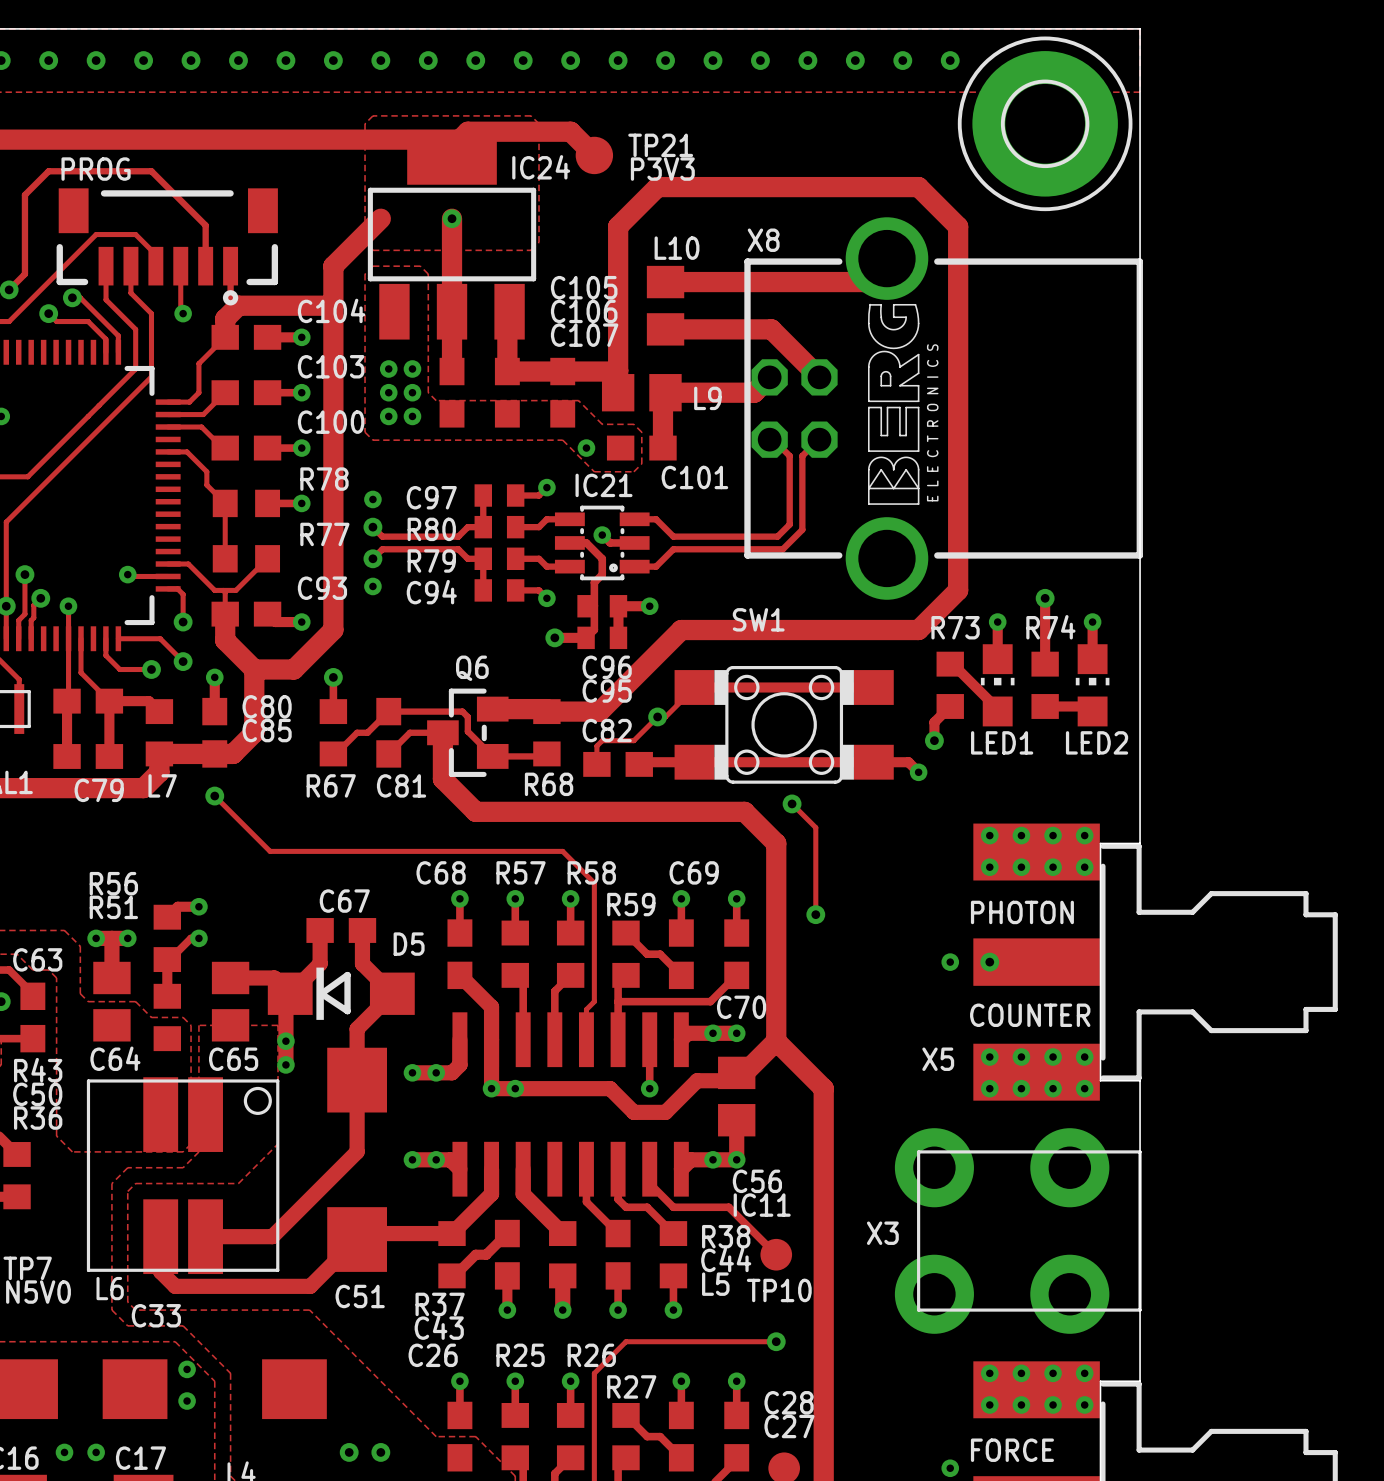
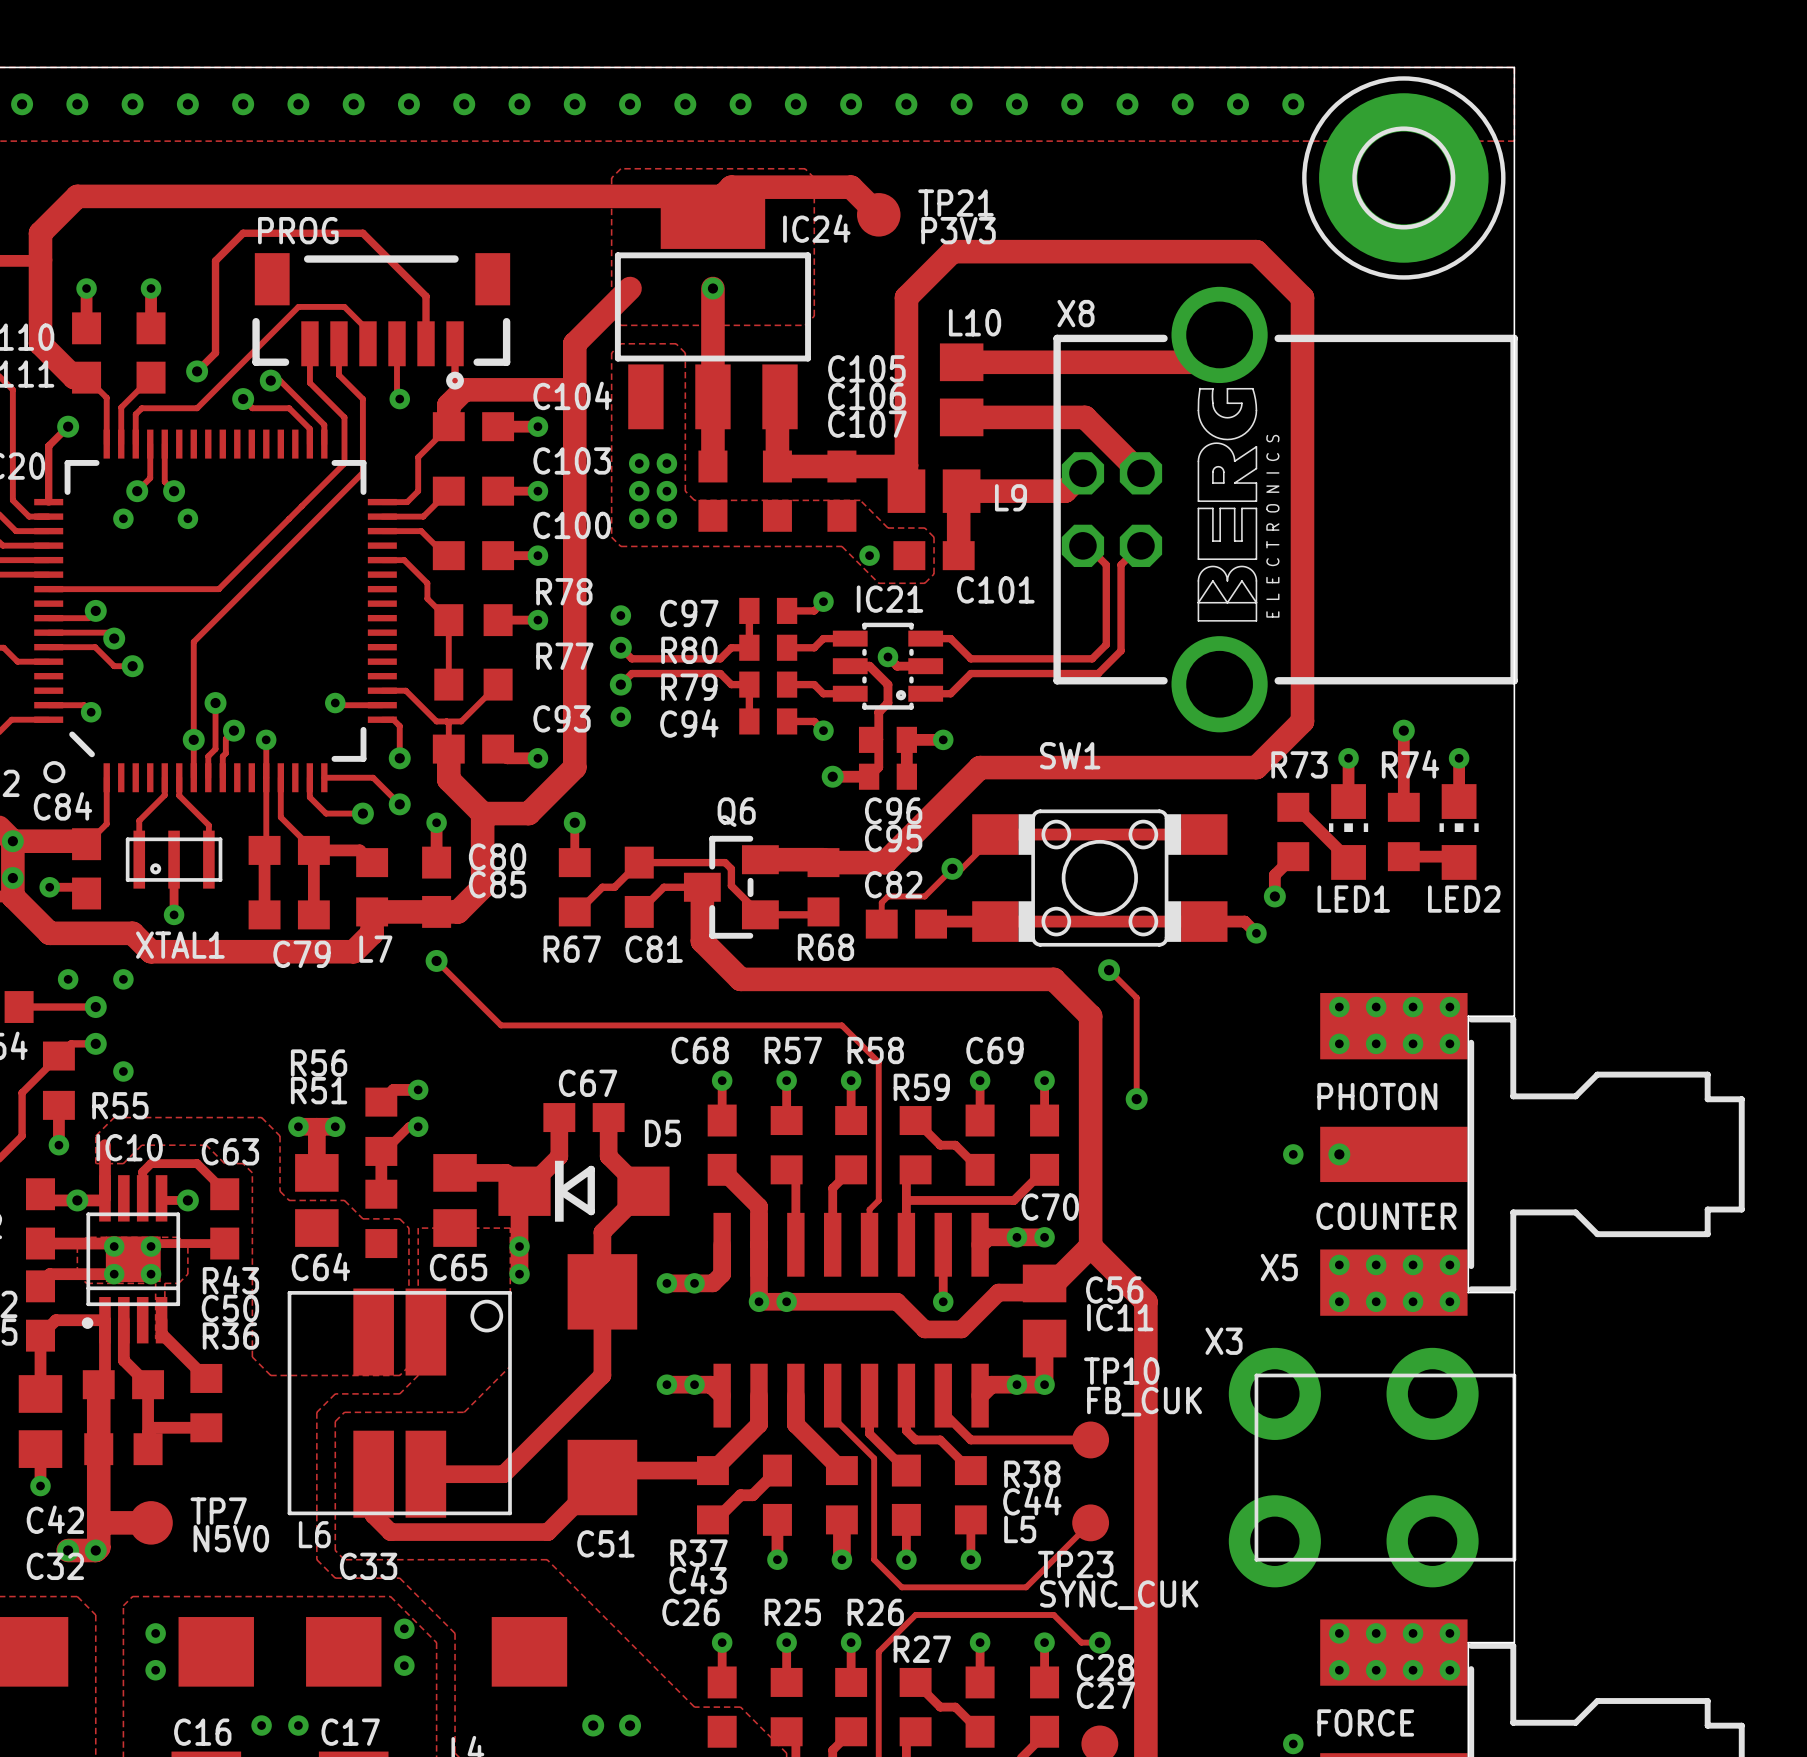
track: none -> (832, 1395) (832, 1416) (874, 1458) (874, 1559) (901, 1587) (1026, 1587) (1090, 1522)
text: none -> FB_CUK (1144, 1401)
C56 name position: C56 (757, 1181) -> C56 (1114, 1290)
IC11 name position: IC11 (762, 1205) -> IC11 (1120, 1317)
track: (728, 1207) (776, 1254) -> (1035, 1439) (1090, 1439)
X3 name position: X3 (882, 1233) -> X3 (1224, 1341)
TP10 position: (776, 1254) -> (1090, 1439)
TP23: none -> (1090, 1522)
TP10 name position: TP10 (779, 1290) -> TP10 (1121, 1371)
text: none -> SYNC_CUK (1119, 1595)
track: (776, 1341) (626, 1341) (594, 1373) (594, 1389) -> (1099, 1642) (1081, 1642) (1053, 1614) (915, 1614) (878, 1651)
via position: (776, 1341) -> (1099, 1642)

